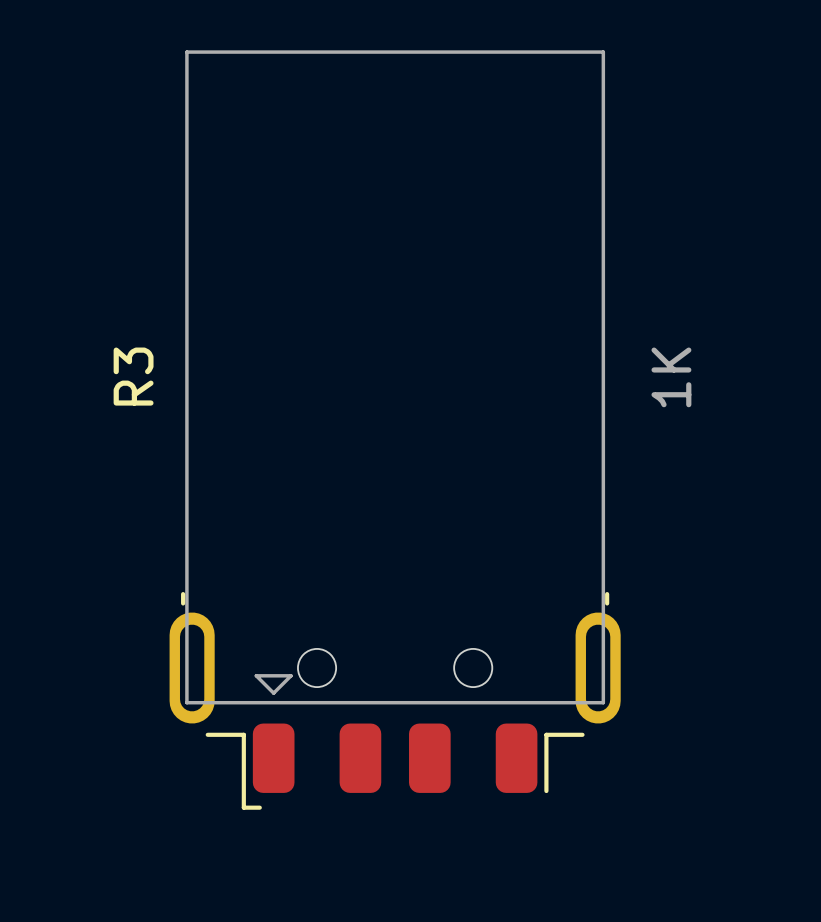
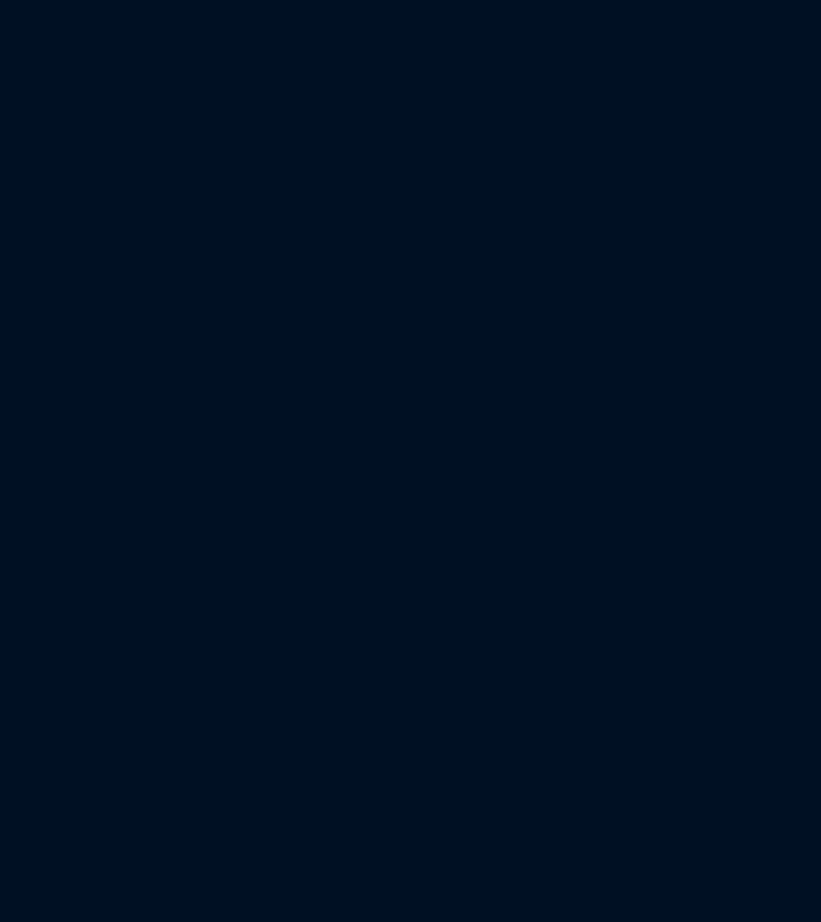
R3: 1K (395, 430) -> none

